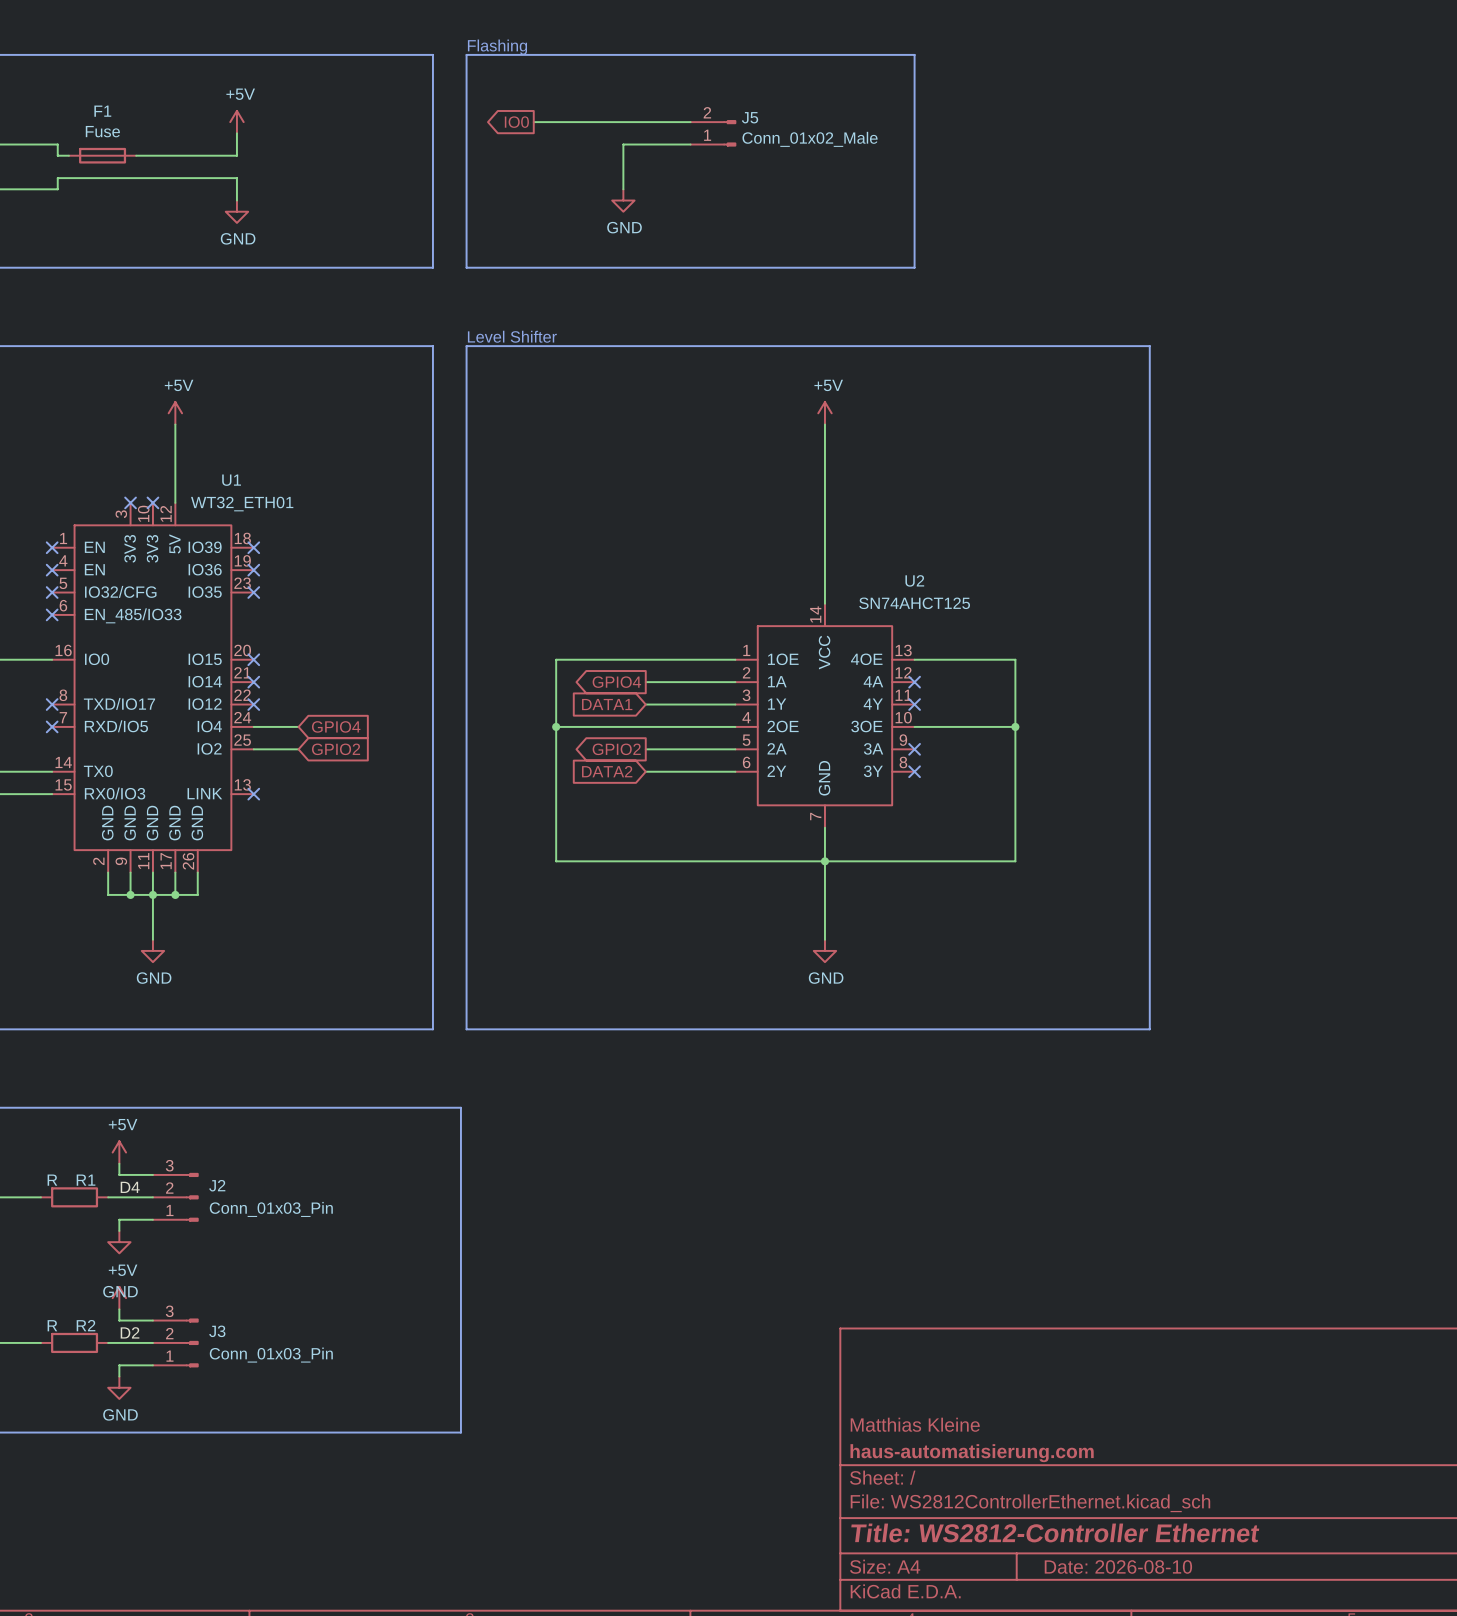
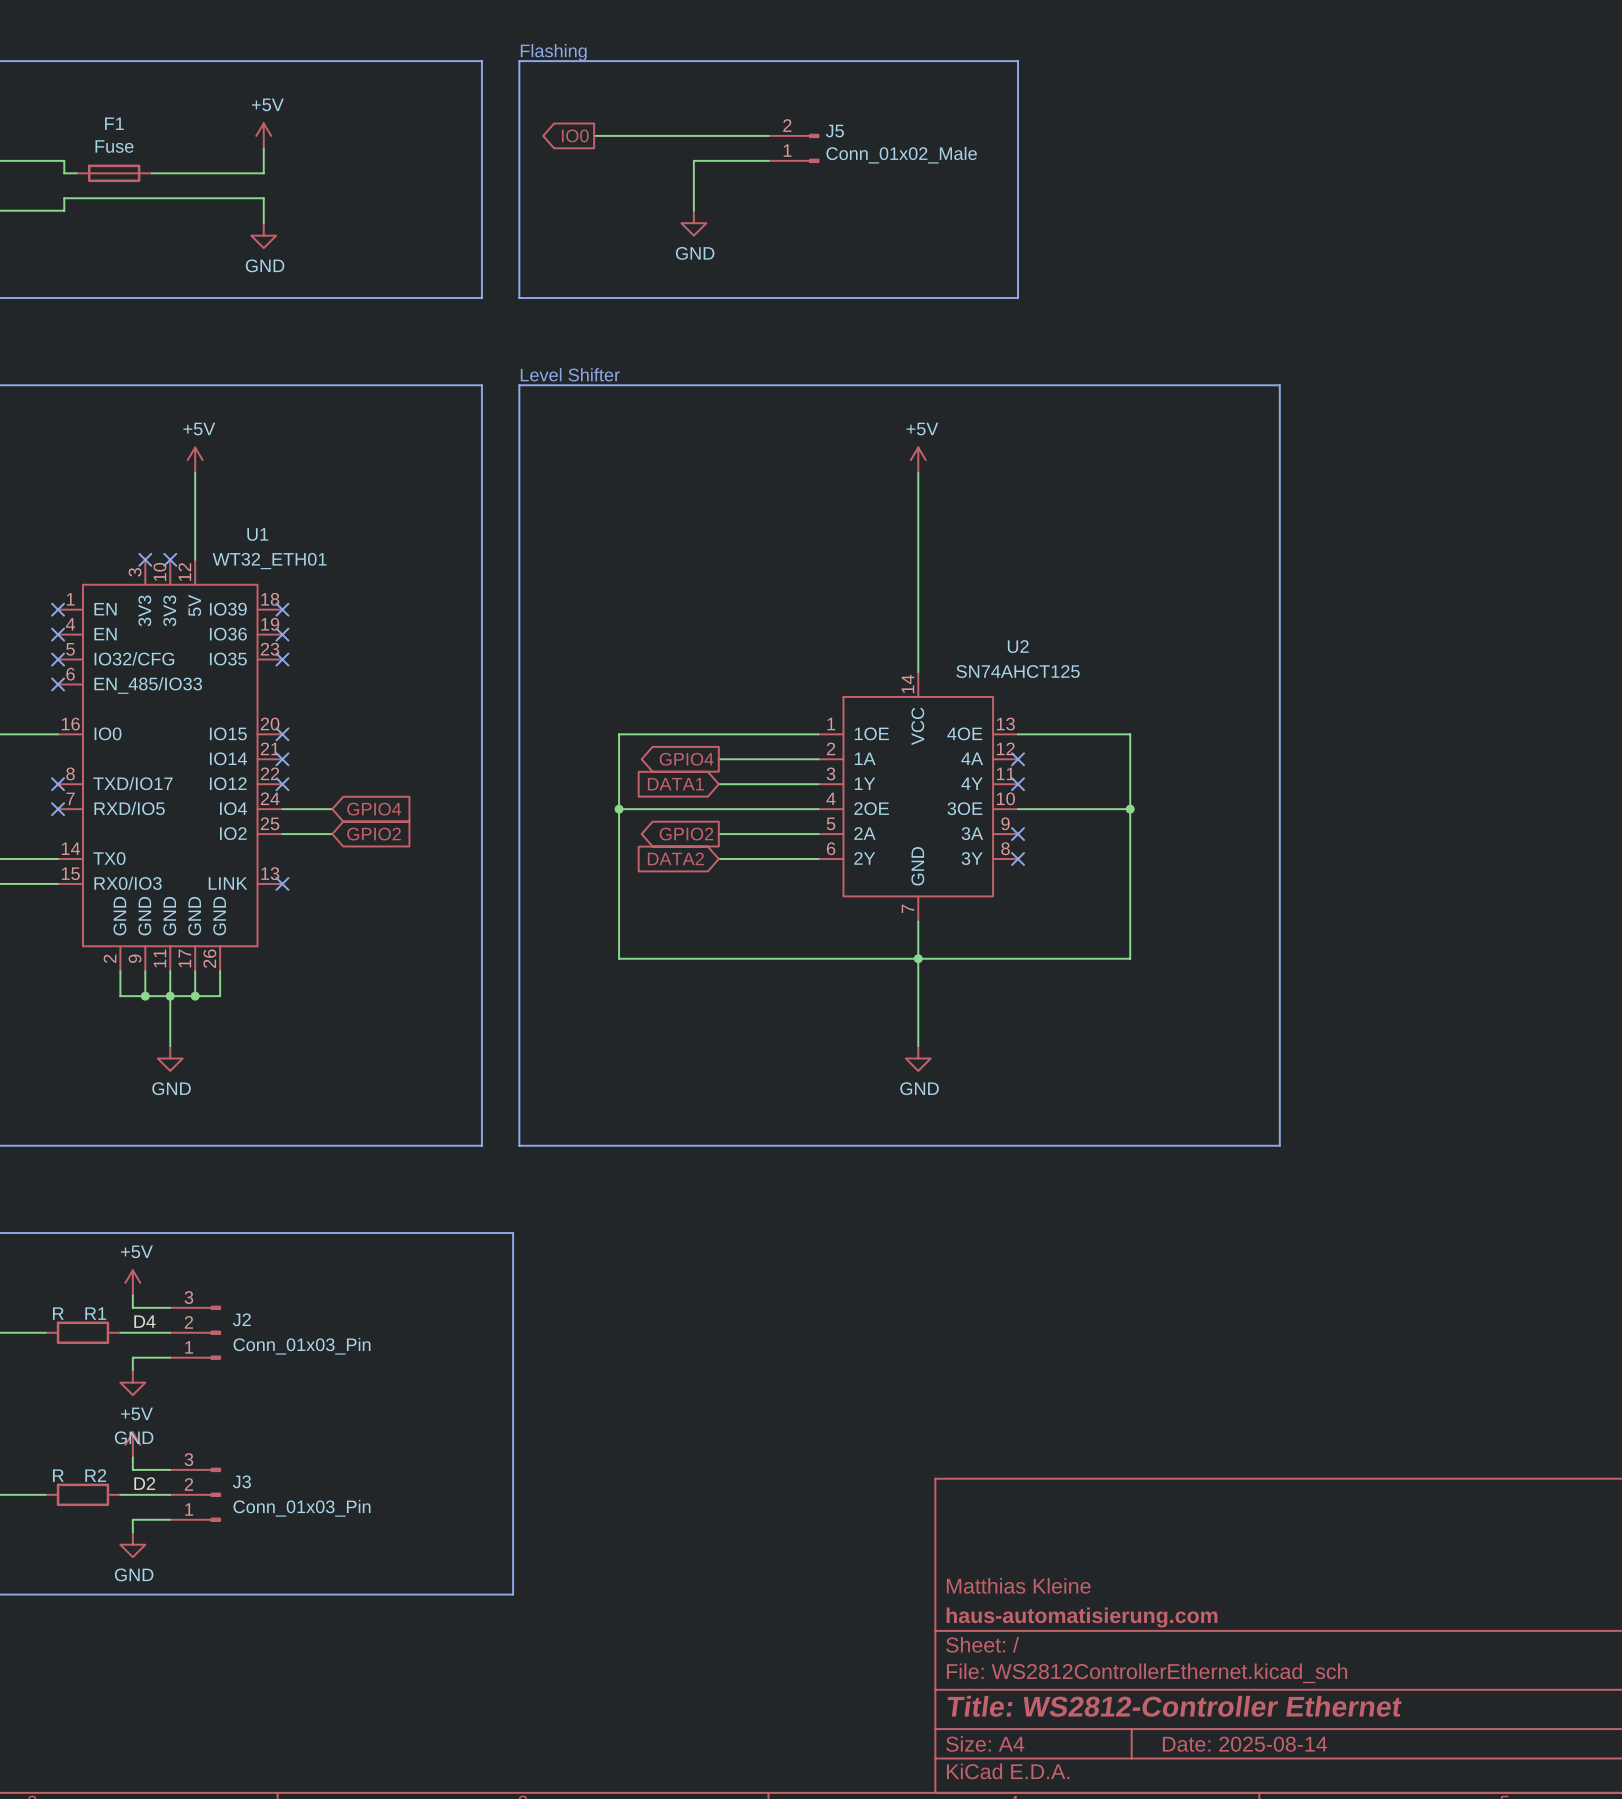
title block: Date: 2026-08-10 (1118, 1566) -> Date: 2025-08-14 (1245, 1744)

